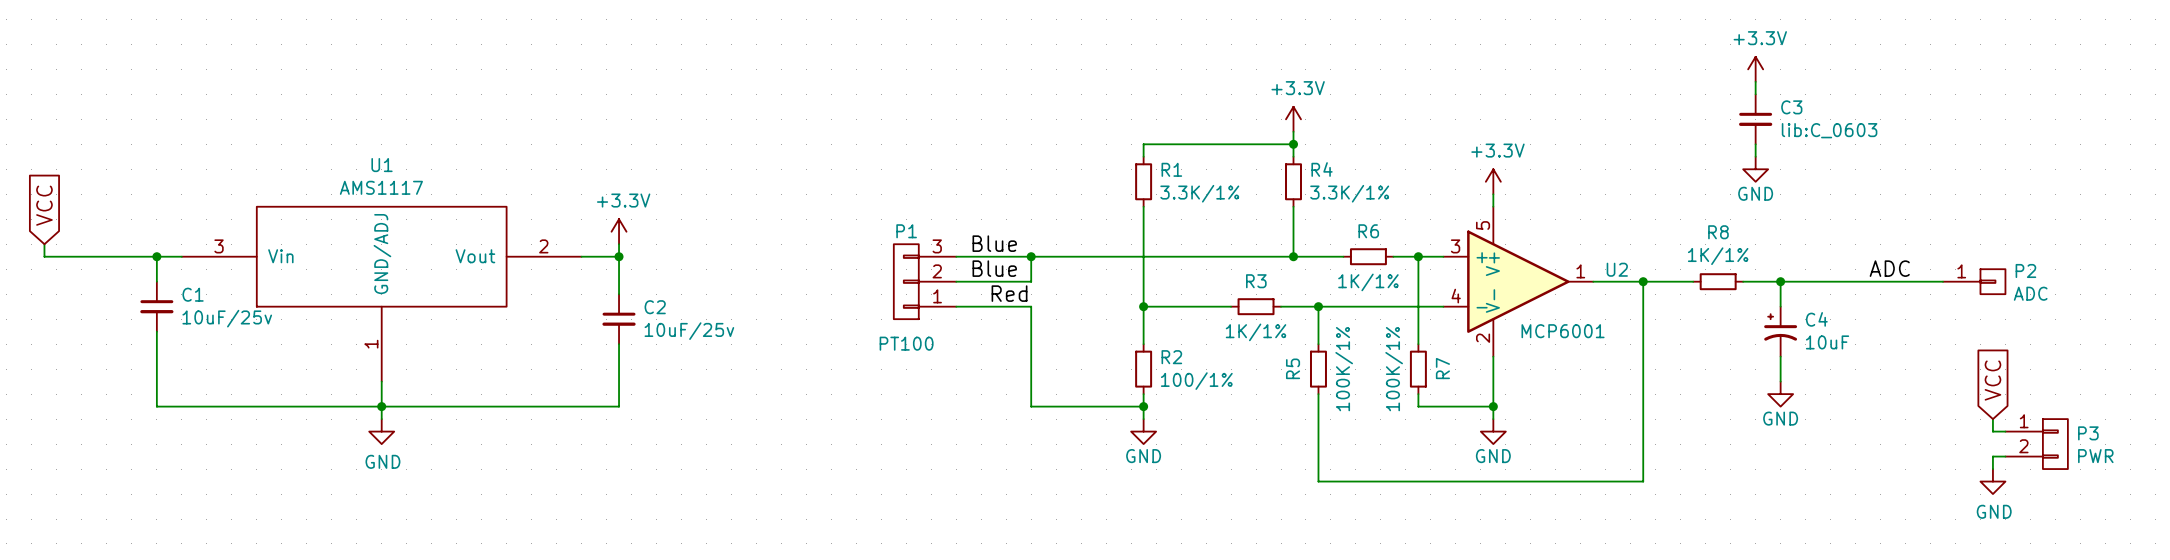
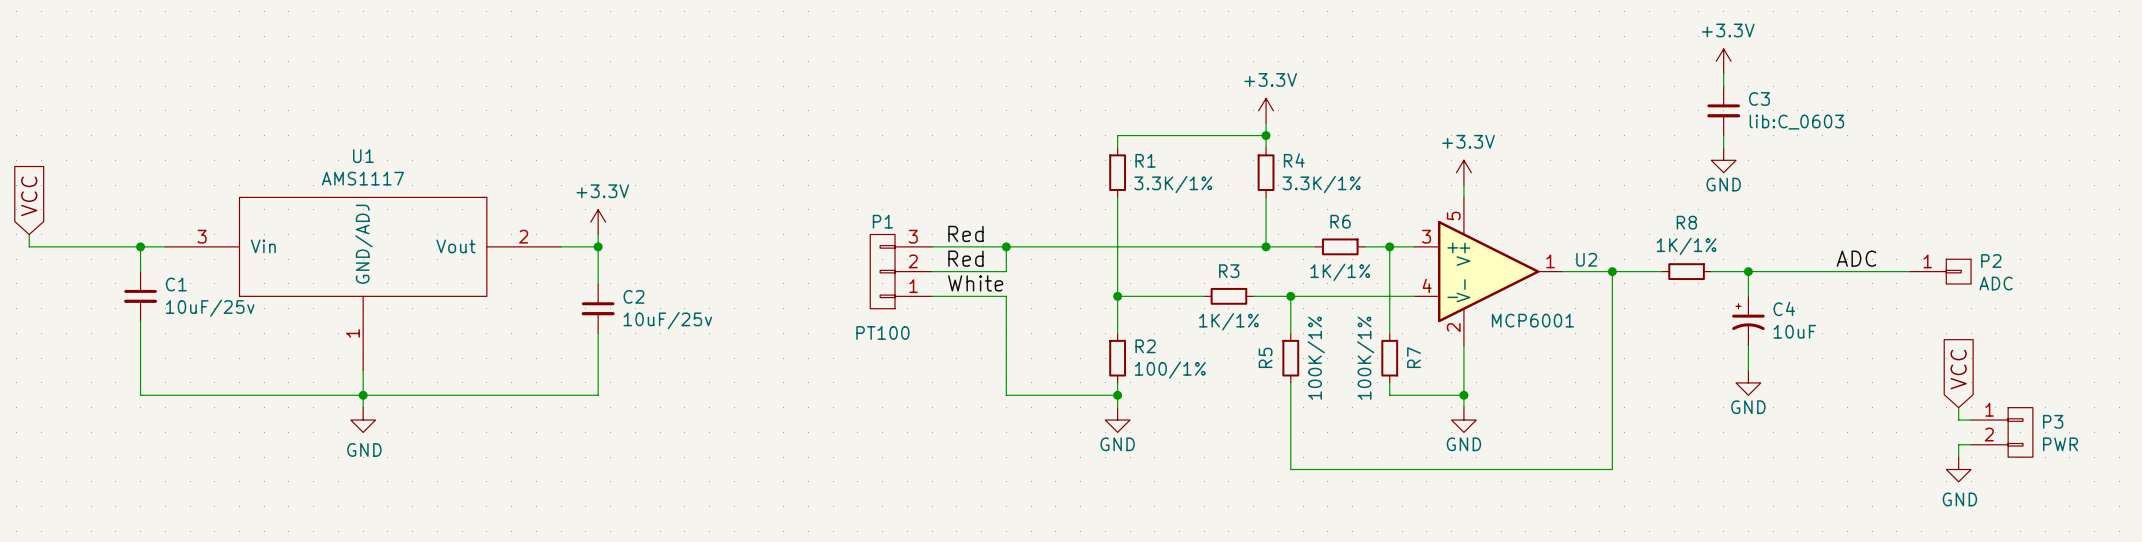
label: Blue (994, 243) -> Red (965, 233)
label: Blue (994, 268) -> Red (965, 258)
label: Red (1009, 293) -> White (975, 283)

